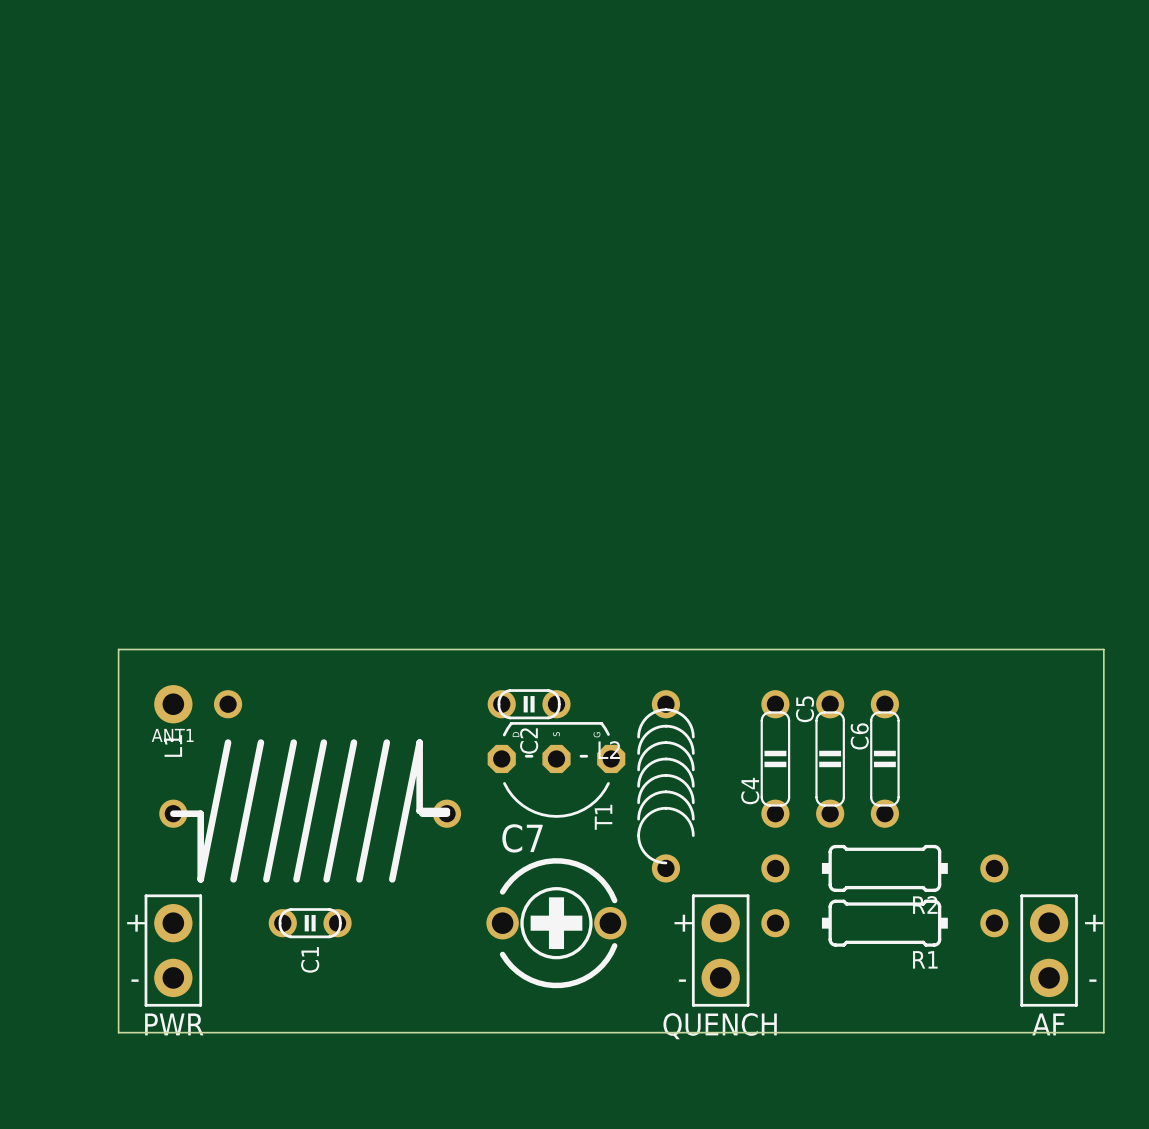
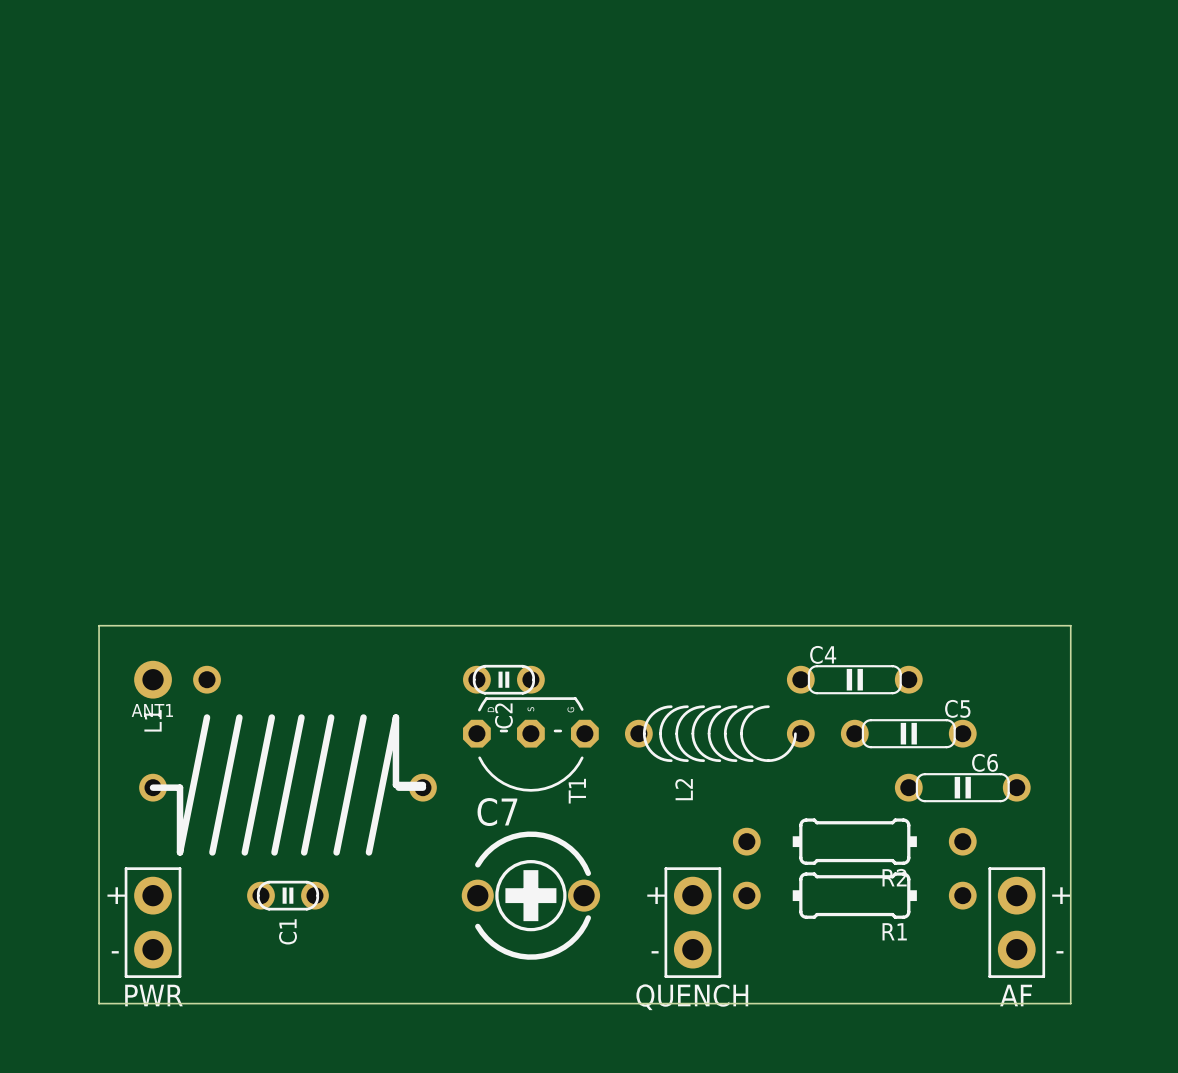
C4 rotation: 0° (775, 758) -> 90° clockwise (854, 679)
C4 position: (775, 758) -> (854, 679)
C5 rotation: 0° (830, 758) -> 90° clockwise (908, 733)
C5 position: (830, 758) -> (908, 733)
C6 rotation: 0° (884, 758) -> 90° clockwise (962, 787)
C6 position: (884, 758) -> (962, 787)
L2 rotation: 0° (665, 786) -> 90° counterclockwise (719, 733)

